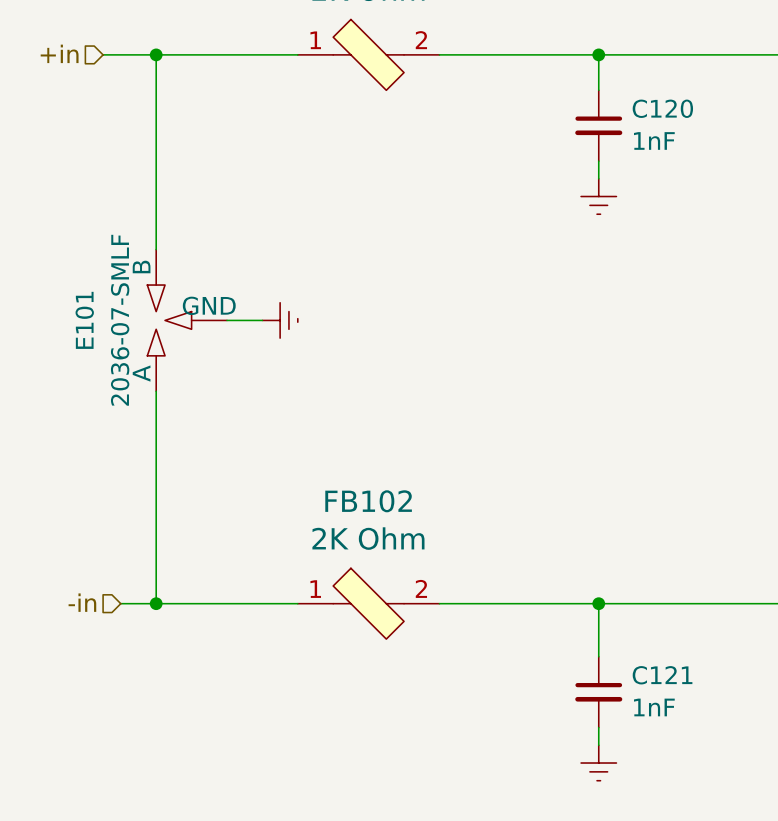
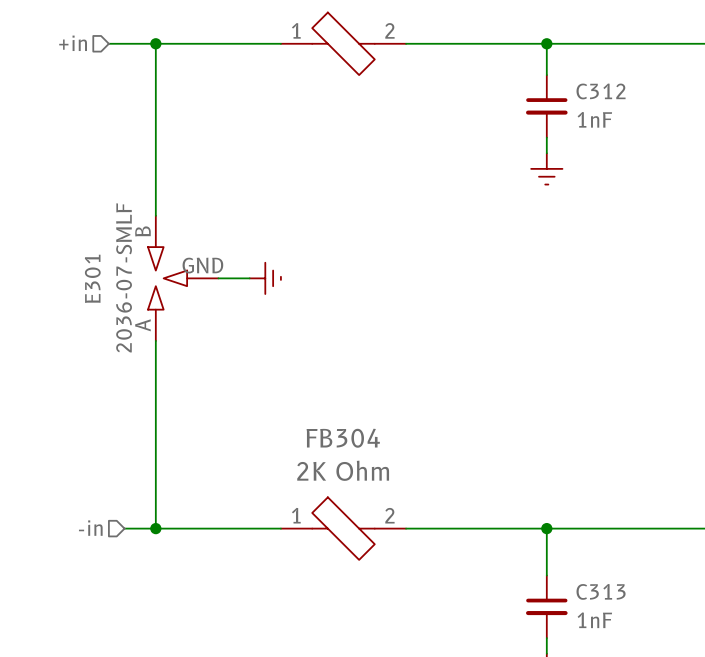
C120 name: C120 (662, 108) -> C312 (601, 91)
E101 name: E101 (84, 320) -> E301 (92, 278)
FB102 name: FB102 (368, 501) -> FB304 (343, 438)
C121 name: C121 (662, 675) -> C313 (601, 591)

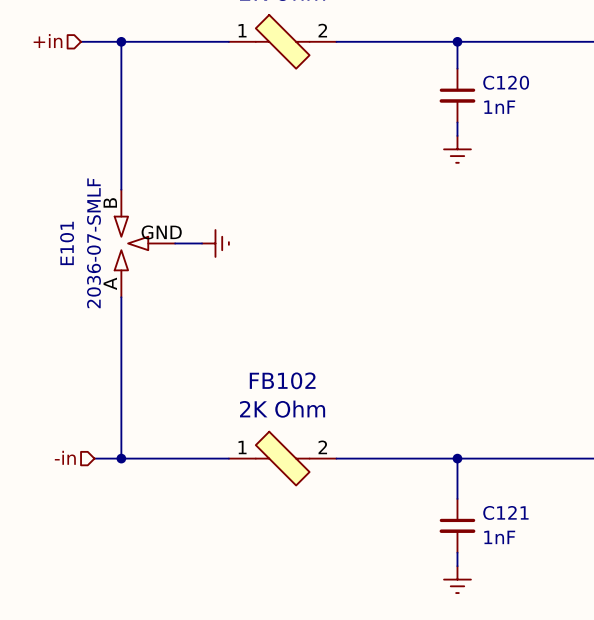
C312 name: C312 (601, 91) -> C120 (506, 82)
E301 name: E301 (92, 278) -> E101 (67, 243)
FB304 name: FB304 (343, 438) -> FB102 (282, 380)
C313 name: C313 (601, 591) -> C121 (505, 512)

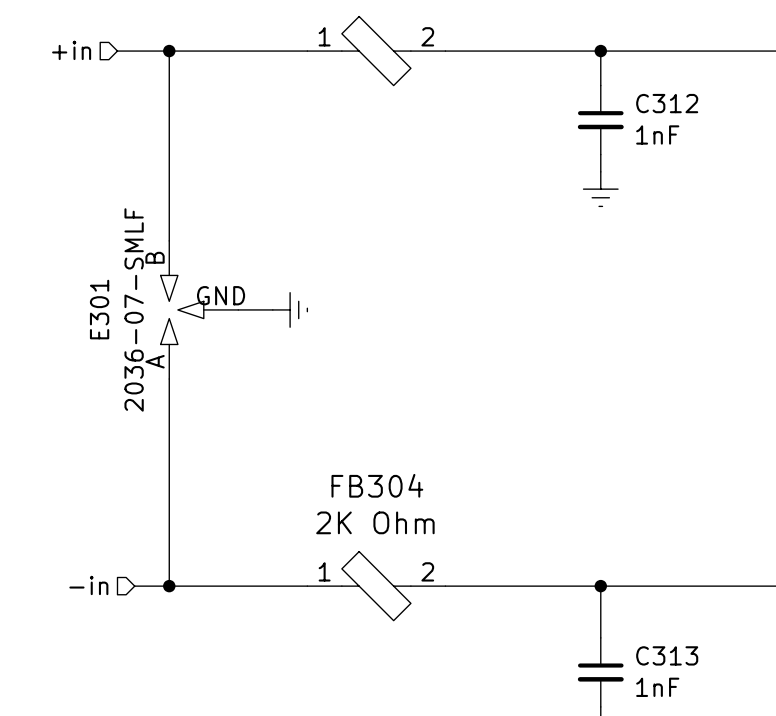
C120 name: C120 (506, 82) -> C312 (667, 103)
E101 name: E101 (67, 243) -> E301 (99, 309)
FB102 name: FB102 (282, 380) -> FB304 (377, 485)
C121 name: C121 (505, 512) -> C313 (667, 655)

